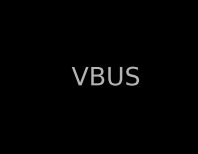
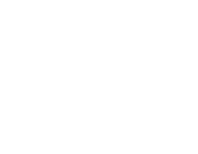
label: VBUS (105, 76) -> none

